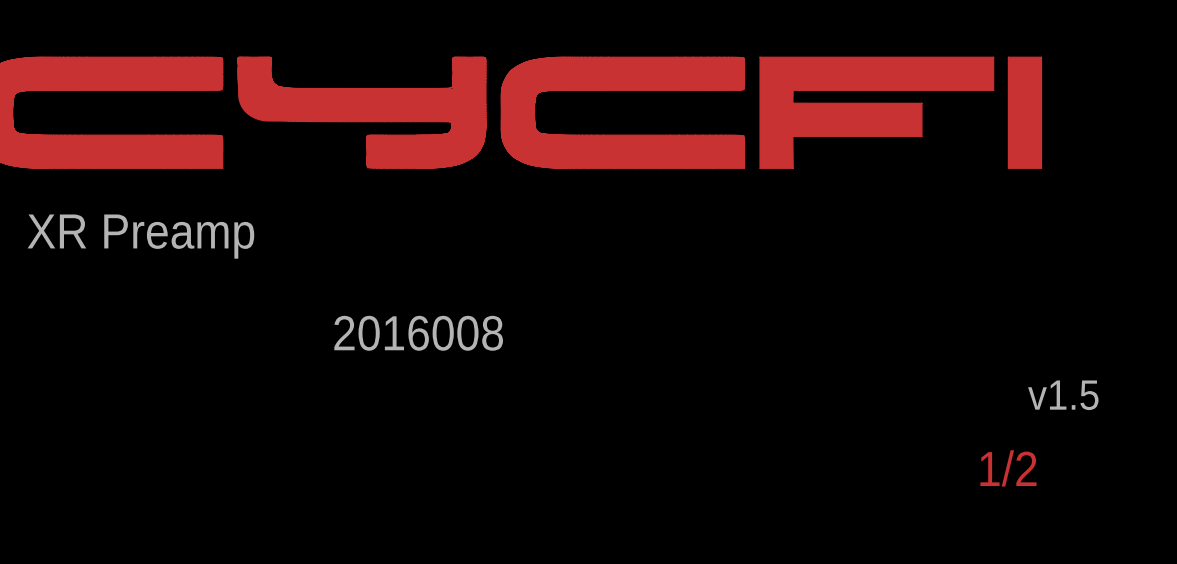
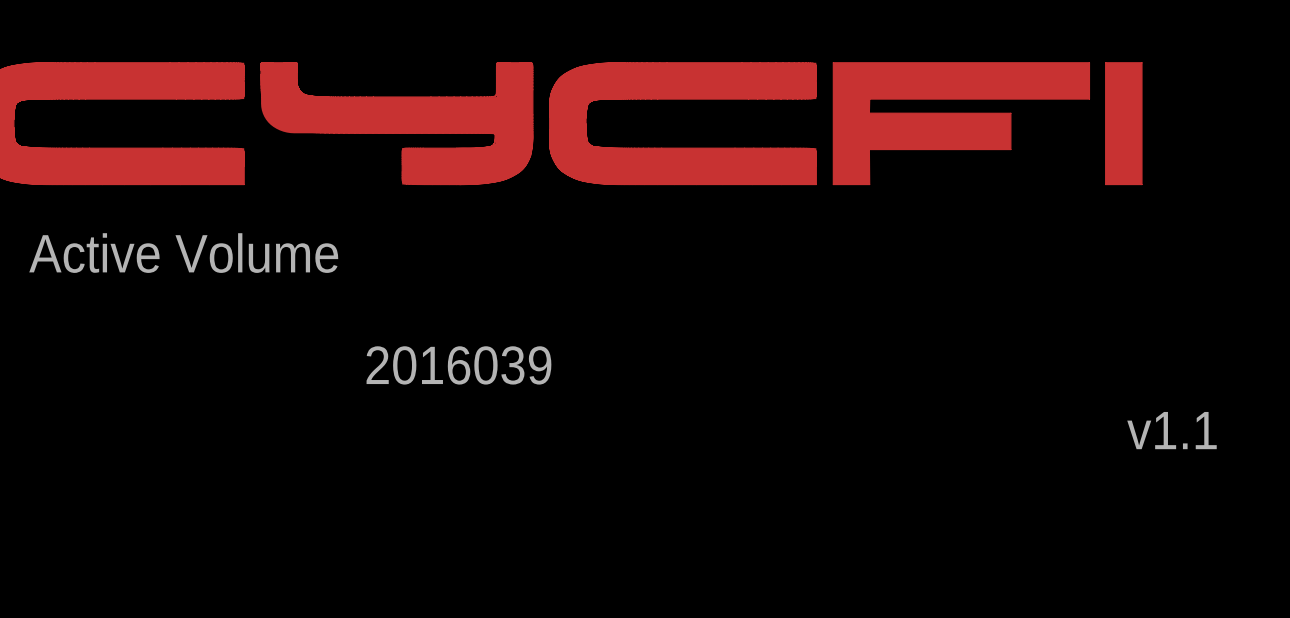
text: XR Preamp (140, 236) -> Active Volume (183, 253)
text: 2016008 (418, 333) -> 2016039 (458, 365)
text: v1.5 (1063, 395) -> v1.1 (1171, 430)
text: 1/2 (1008, 468) -> none

